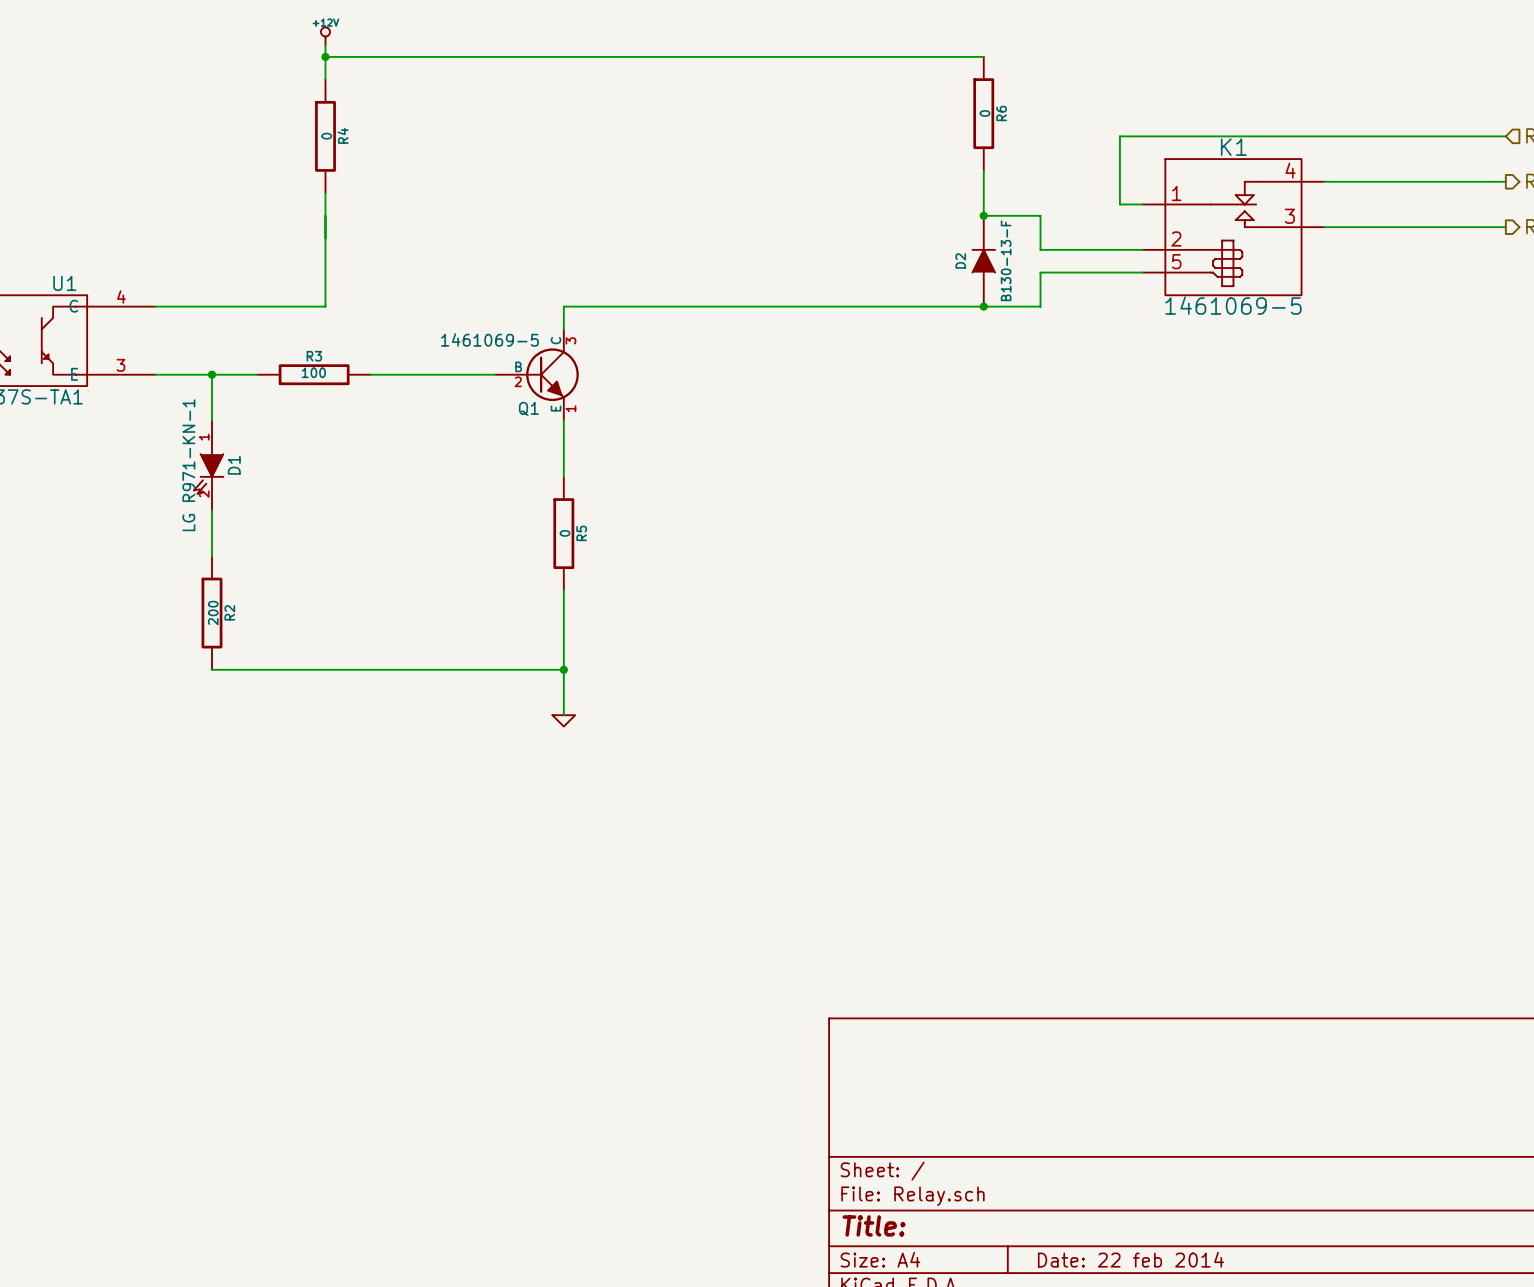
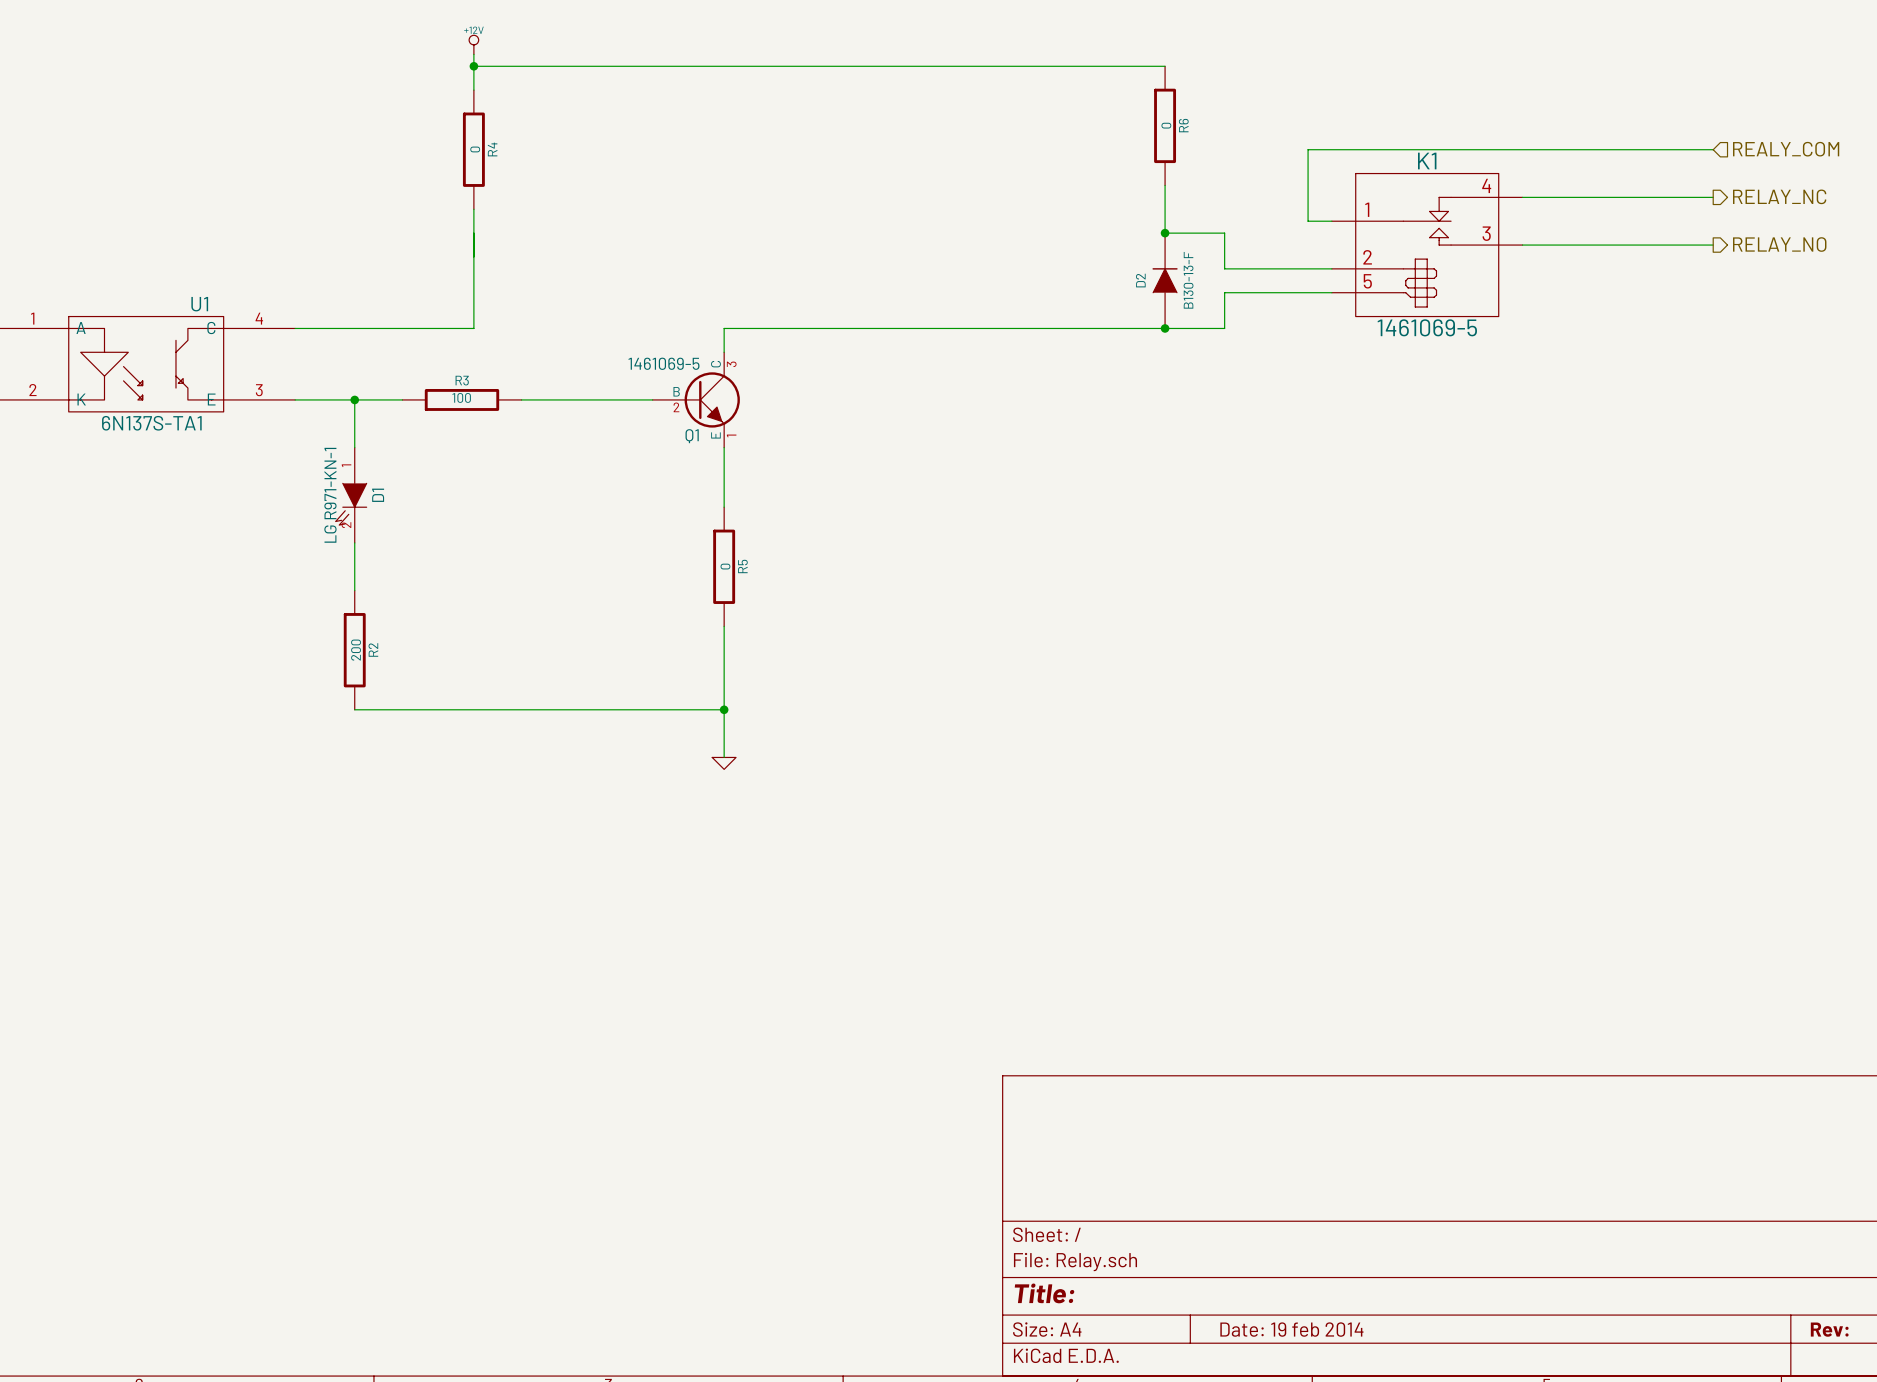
title block: Date: 22 feb 2014 (1130, 1259) -> Date: 19 feb 2014 (1291, 1329)

